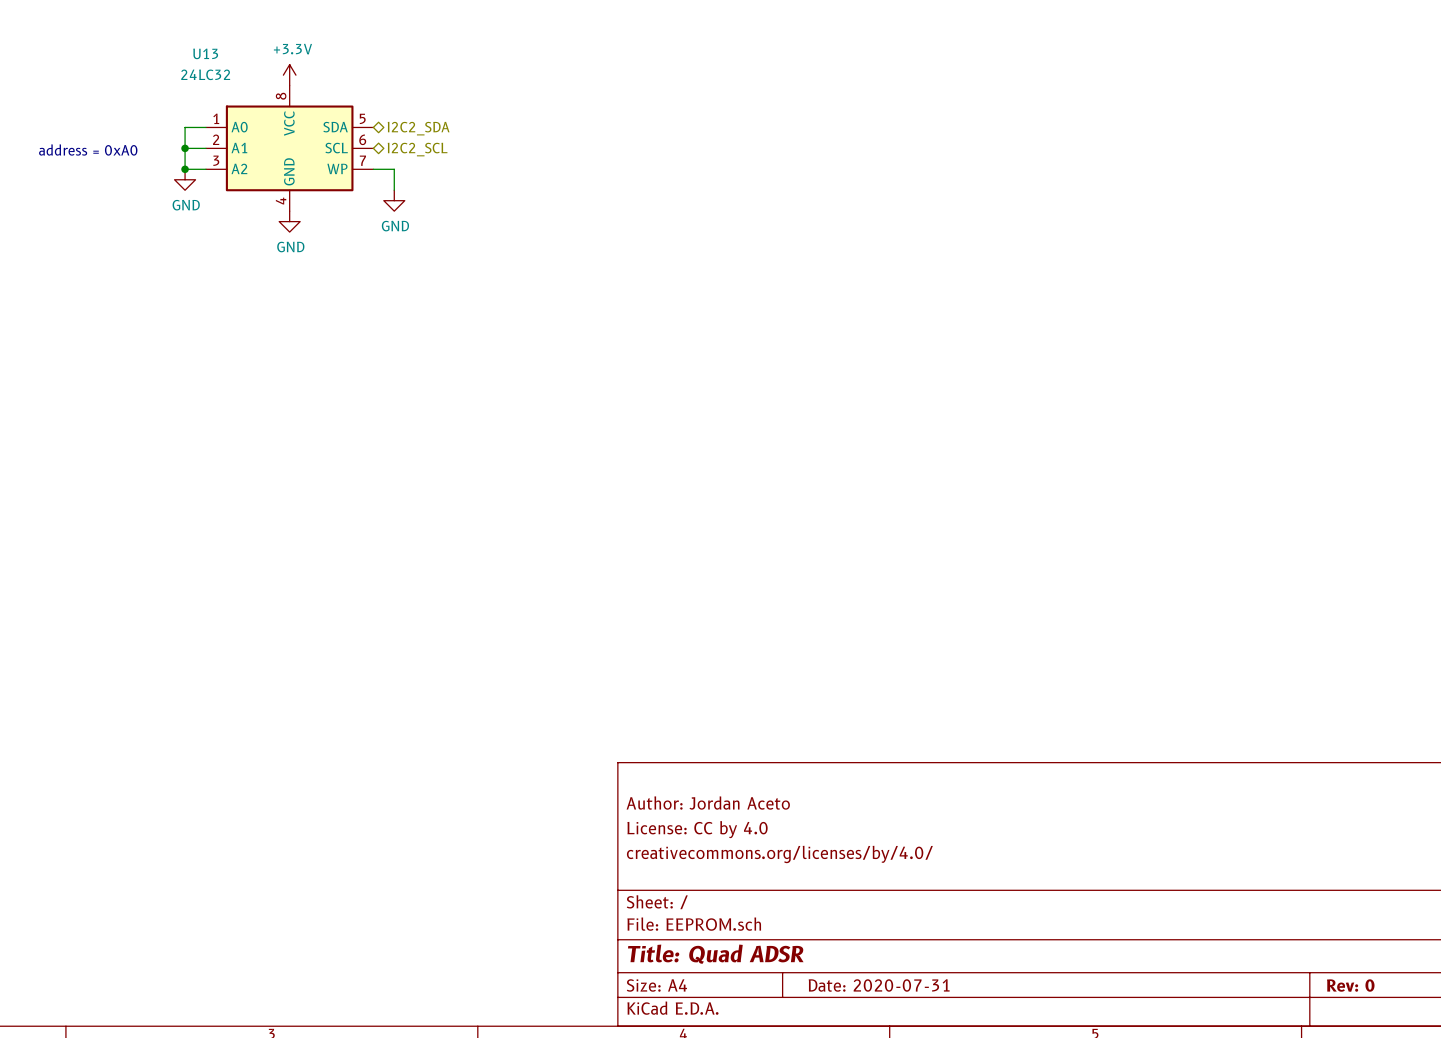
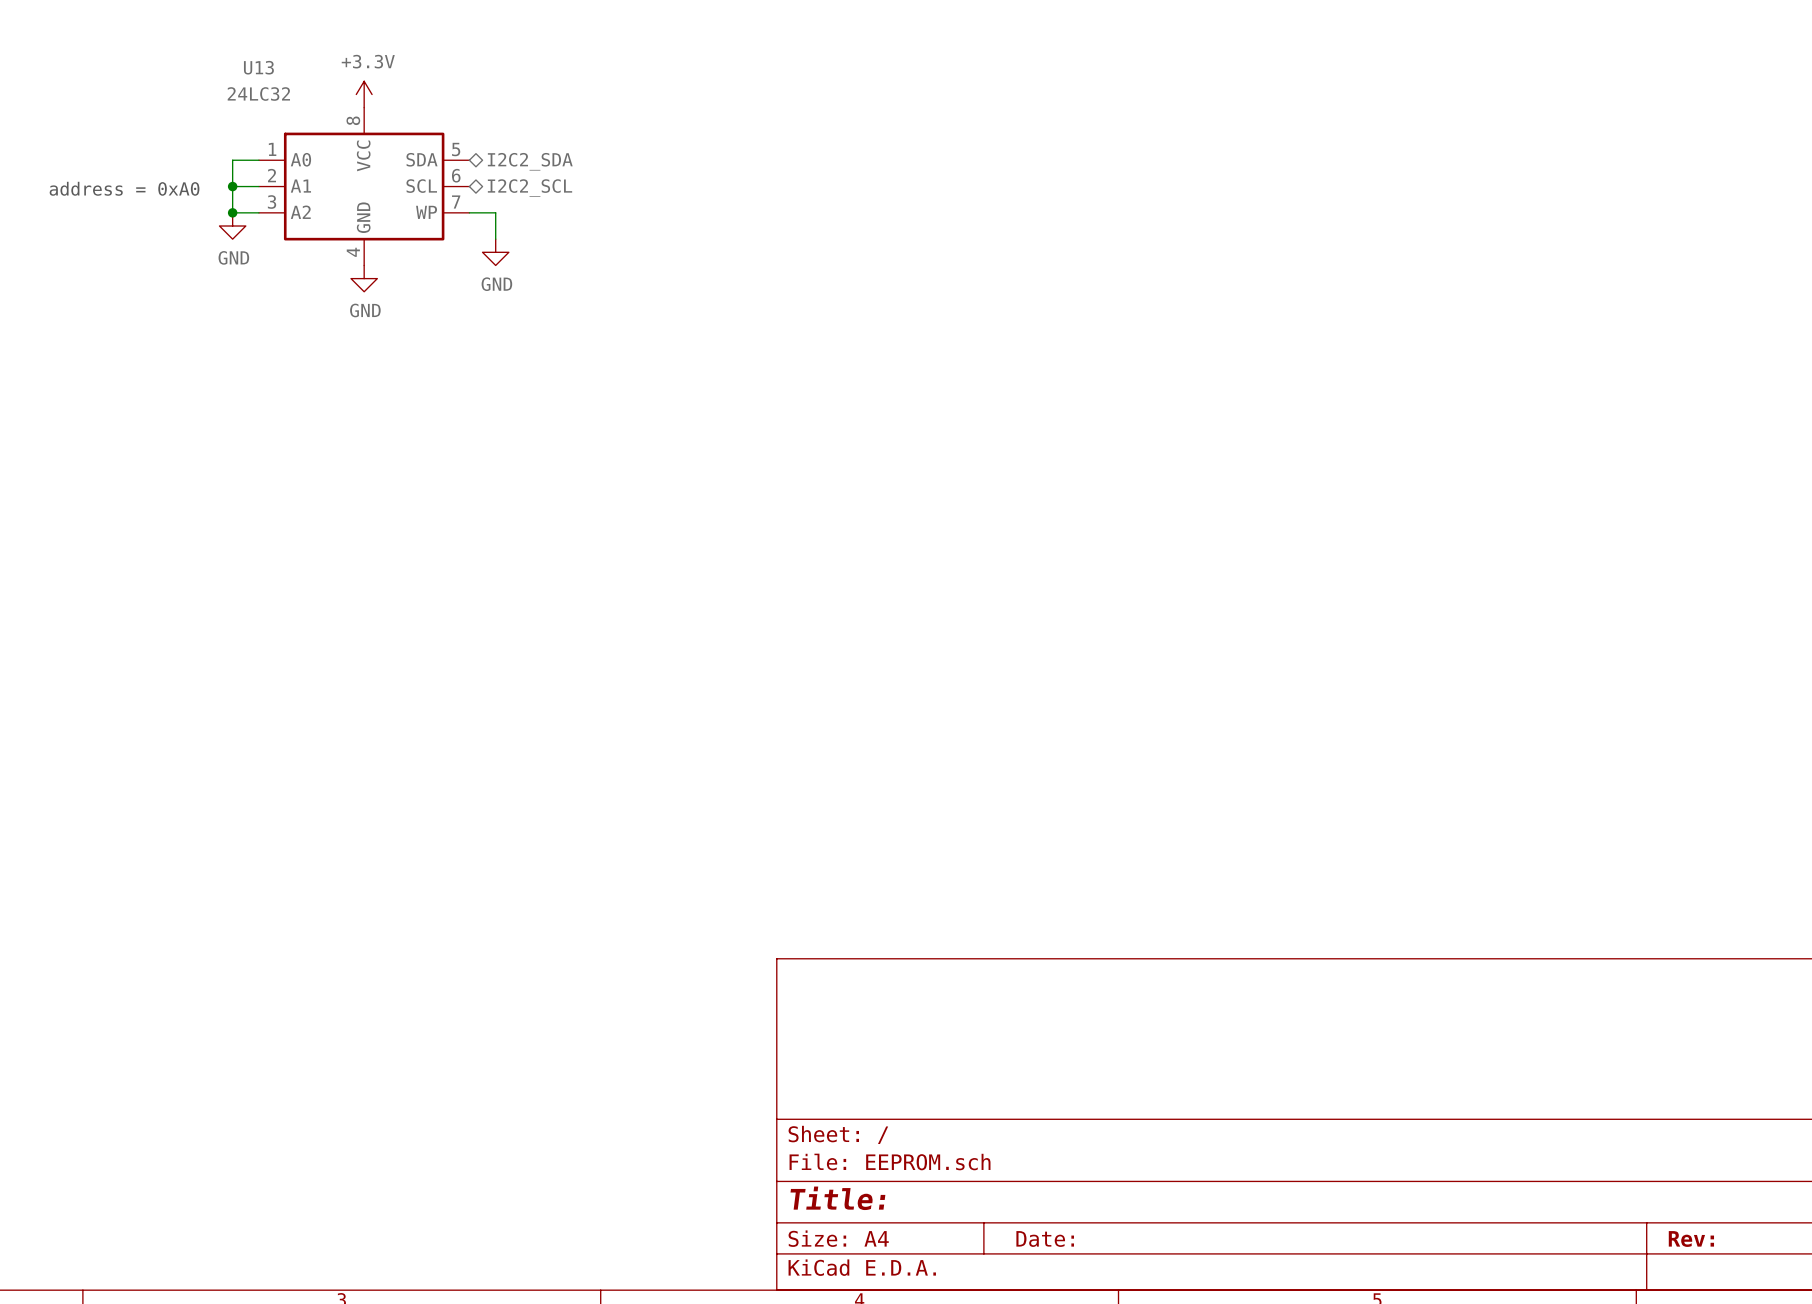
title block: Author: Jordan Aceto (708, 803) -> none
title block: License: CC by 4.0 (697, 829) -> none
title block: creativecommons.org/licenses/by/4.0/ (779, 854) -> none
title block: Title: Quad ADSR (715, 954) -> Title: (837, 1198)
title block: Date: 2020-07-31 (879, 985) -> Date: (1045, 1239)
title block: Rev: 0 (1350, 985) -> Rev: (1691, 1239)

